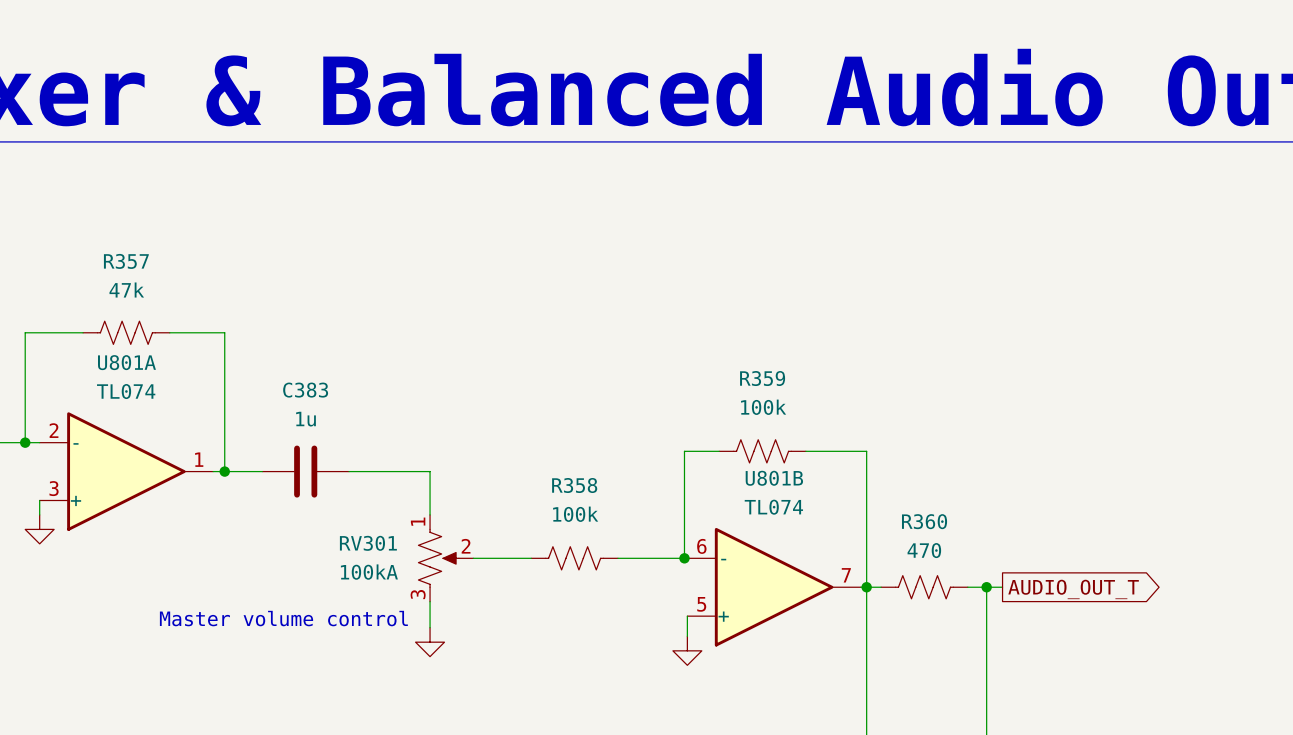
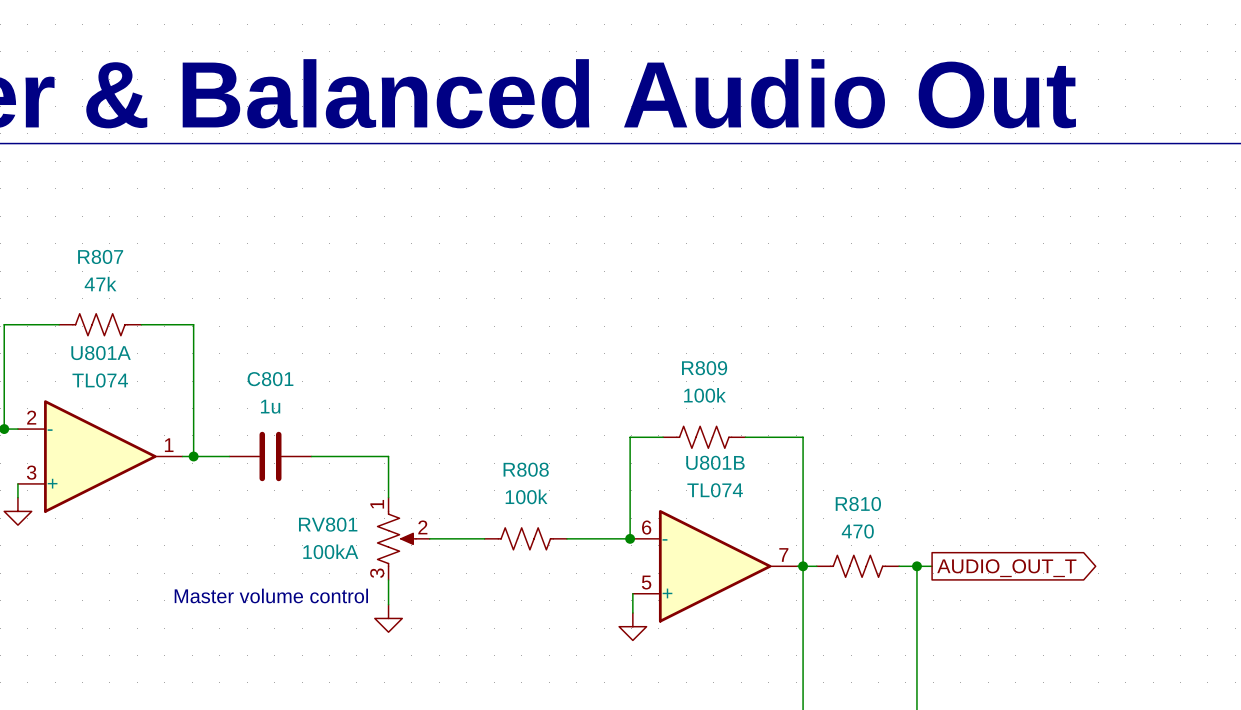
R357 name: R357 (126, 261) -> R807 (100, 256)
R359 name: R359 (762, 378) -> R809 (704, 368)
C383 name: C383 (305, 390) -> C801 (270, 379)
R358 name: R358 (574, 485) -> R808 (526, 469)
R360 name: R360 (924, 521) -> R810 (858, 504)
RV301 name: RV301 (368, 543) -> RV801 (328, 524)

